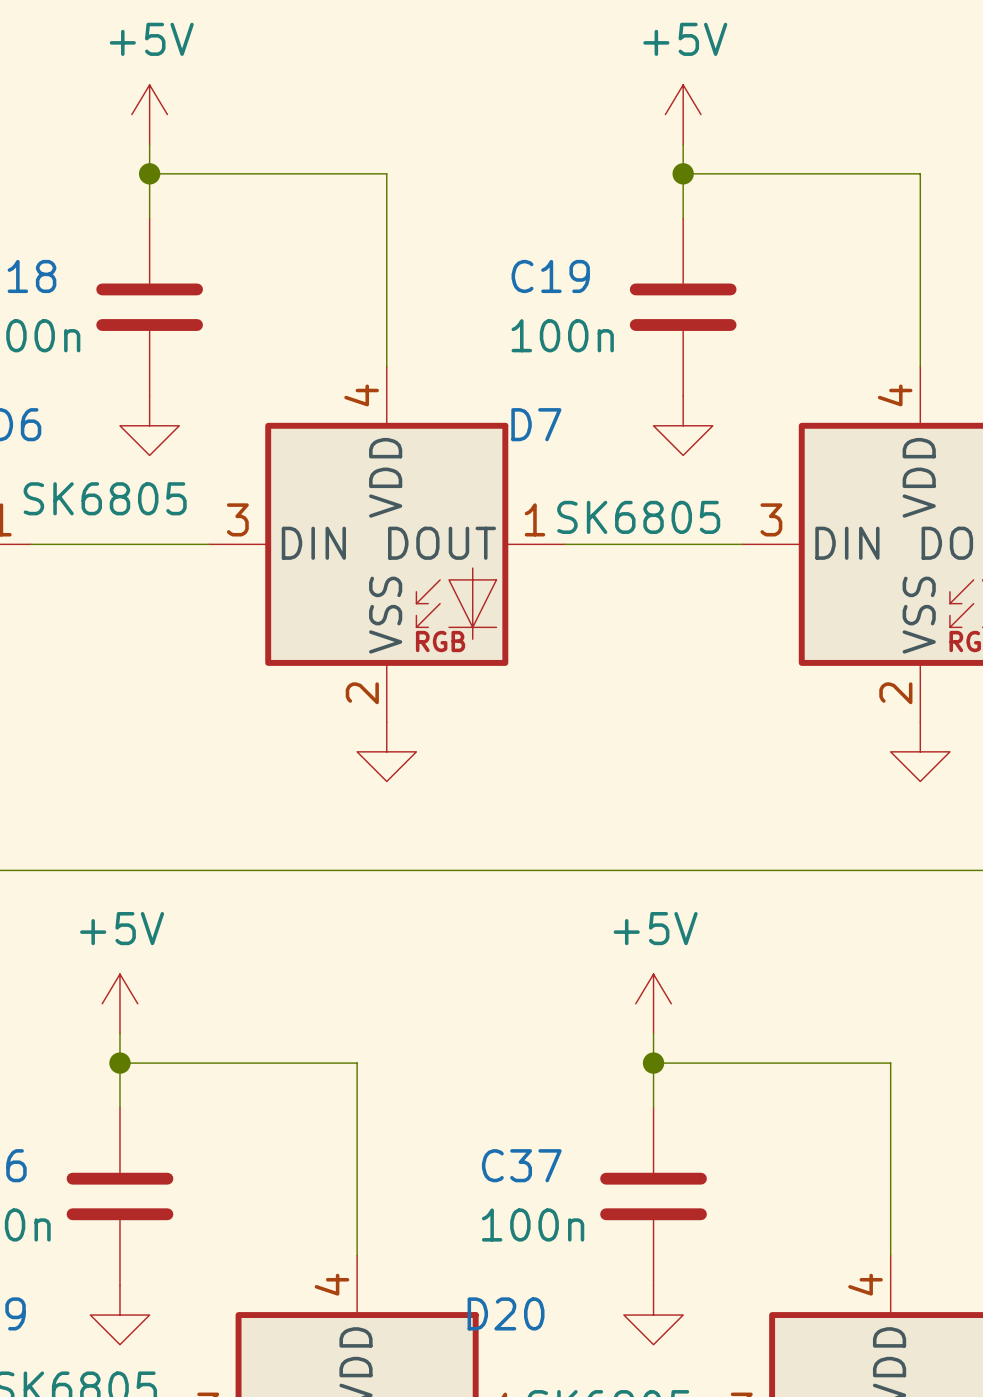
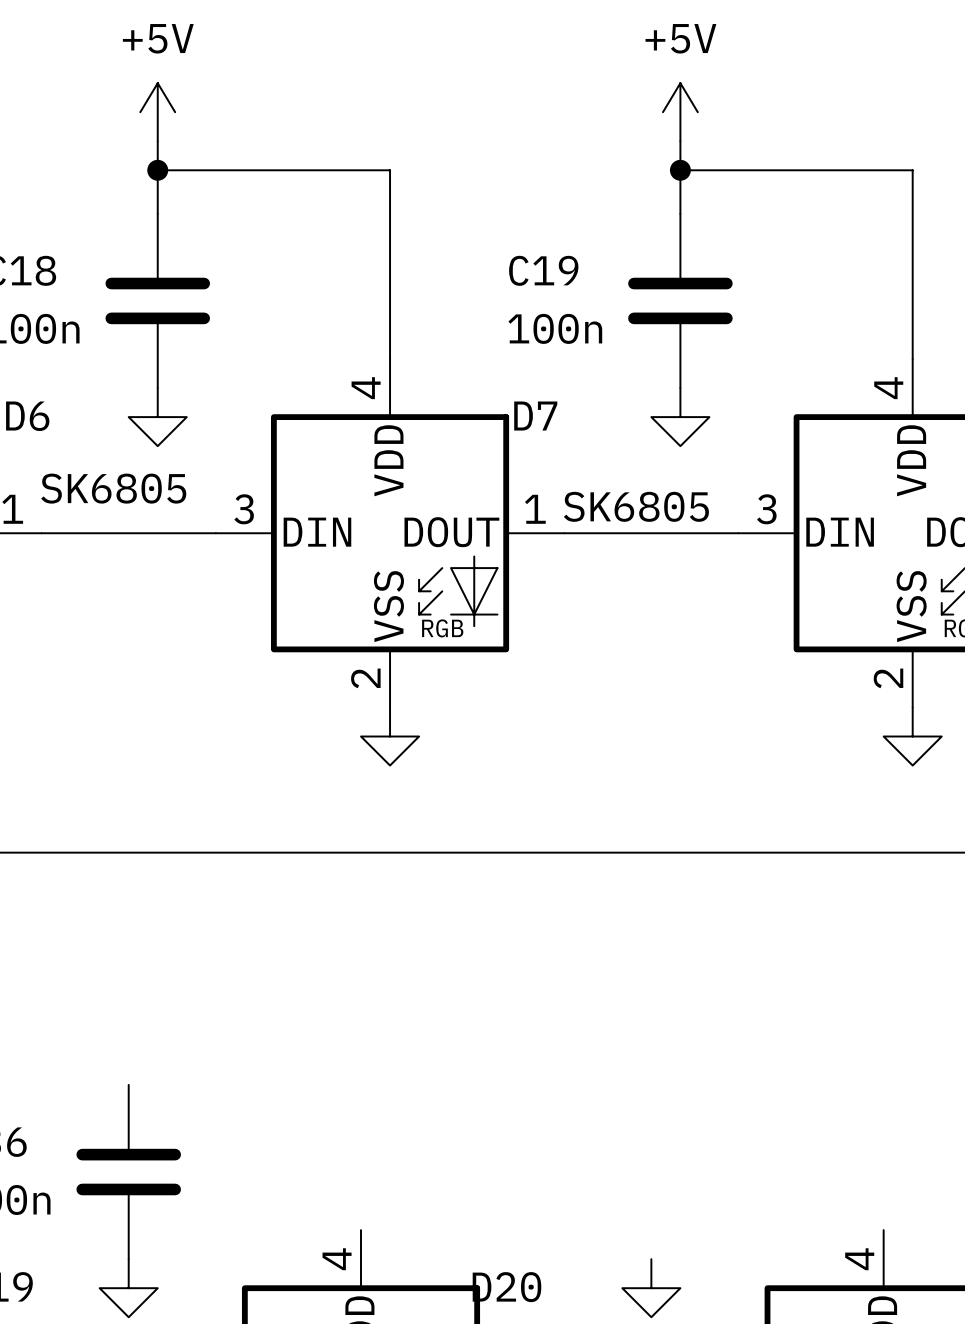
power symbol: +5V (119, 1003) -> none
power symbol: +5V (653, 1003) -> none
wire: (119, 1033) (119, 1107) -> none
wire: (653, 1033) (653, 1107) -> none
wire: (119, 1063) (357, 1063) (357, 1255) -> none
junction: (119, 1063) -> none
wire: (653, 1063) (890, 1063) (890, 1255) -> none
junction: (653, 1063) -> none
C37: 100n (653, 1196) -> none

